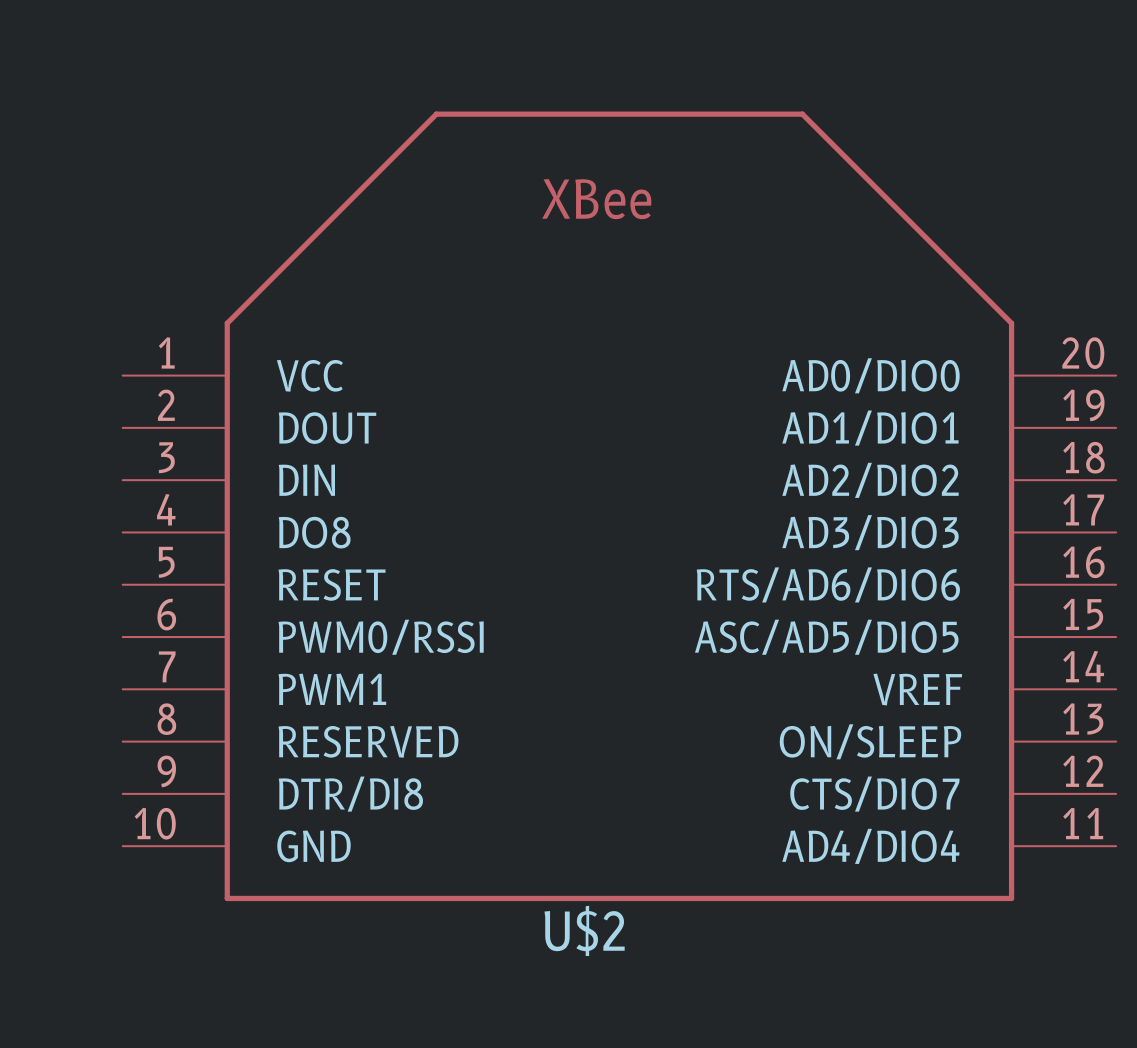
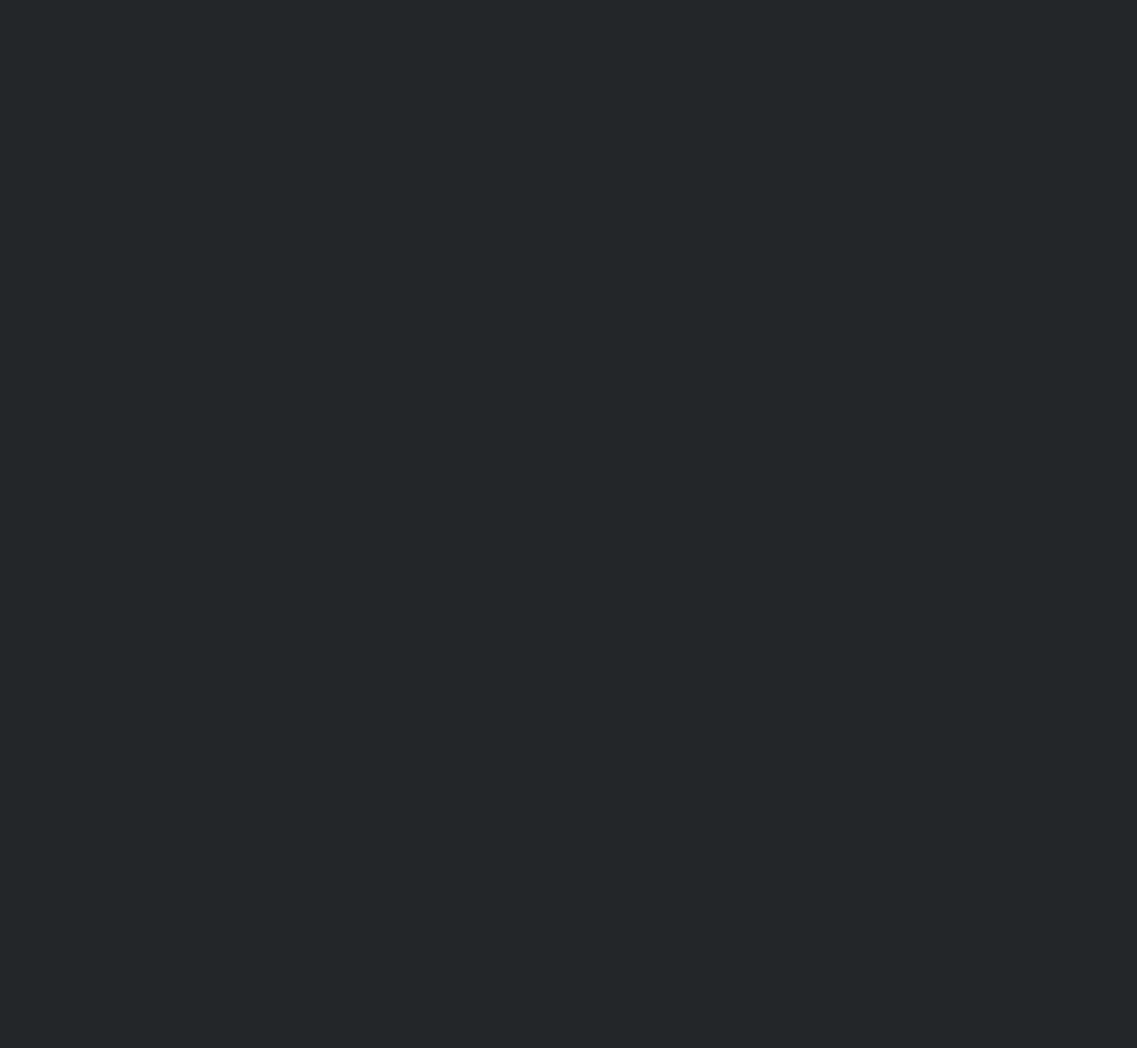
U$2: (619, 506) -> none

